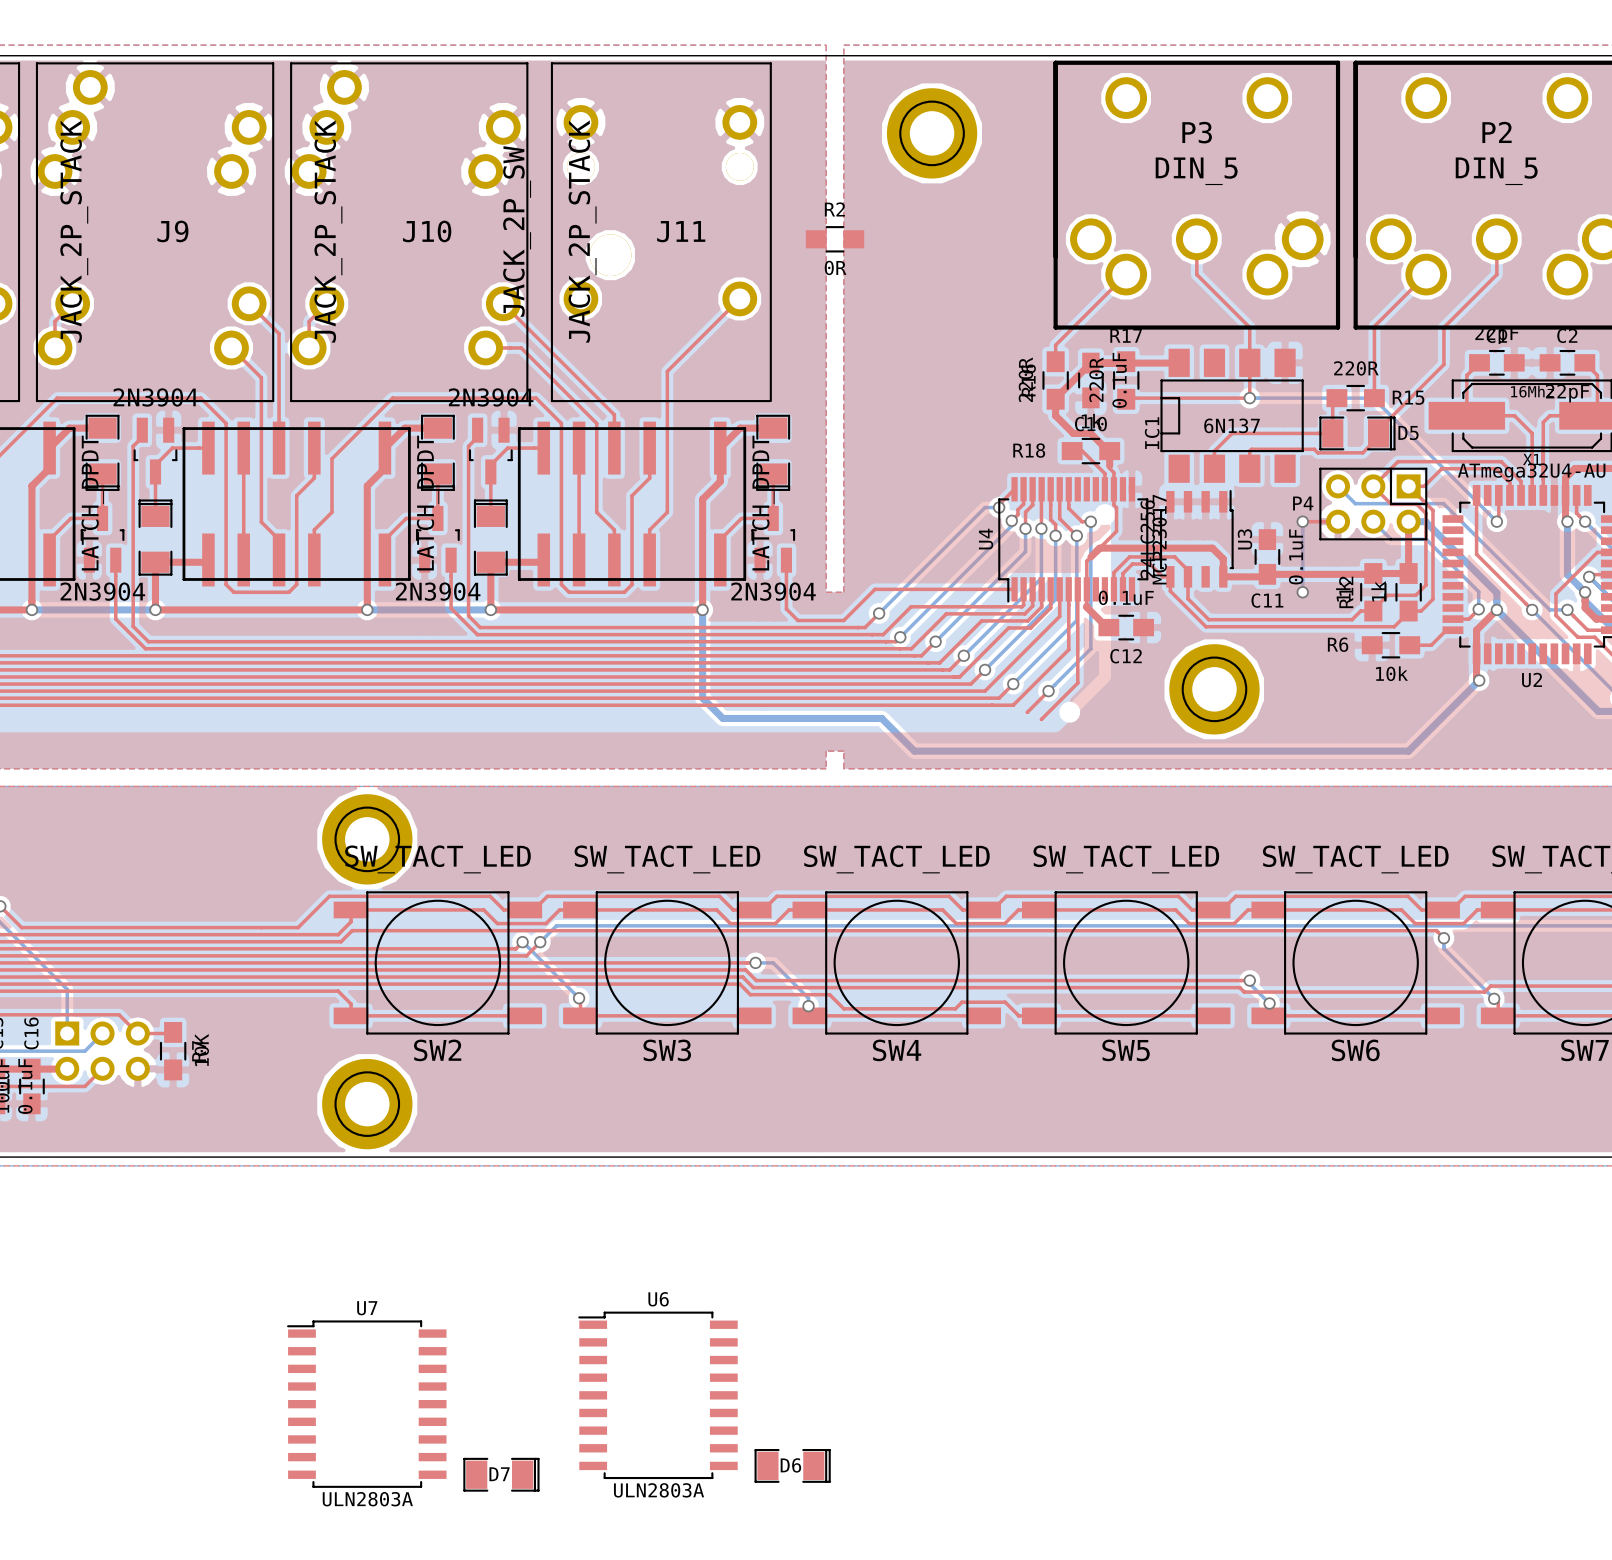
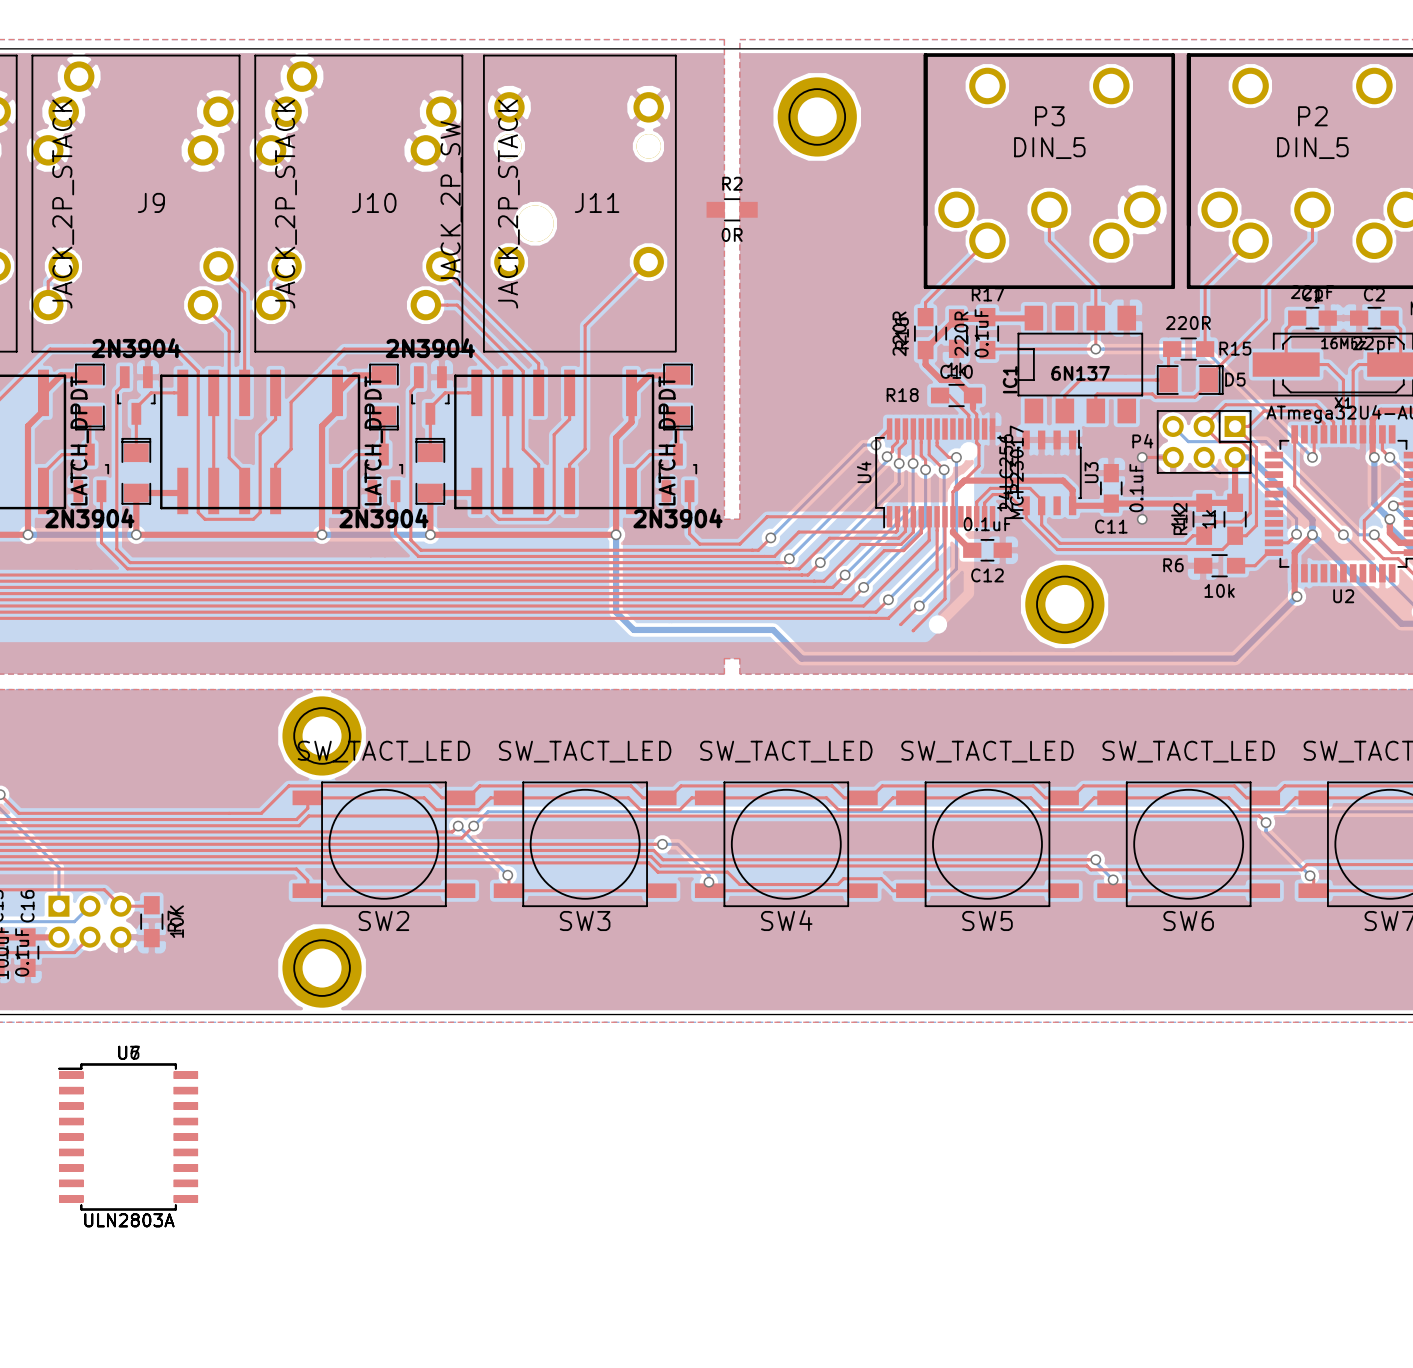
U6 position: (657, 1395) -> (128, 1136)
U7 position: (366, 1404) -> (128, 1136)
D6: (792, 1465) -> none
D7: (501, 1474) -> none

